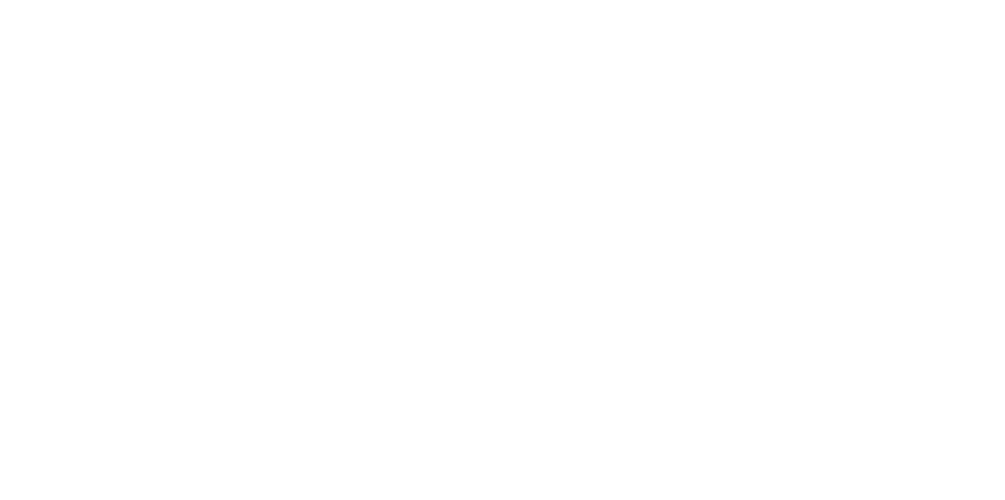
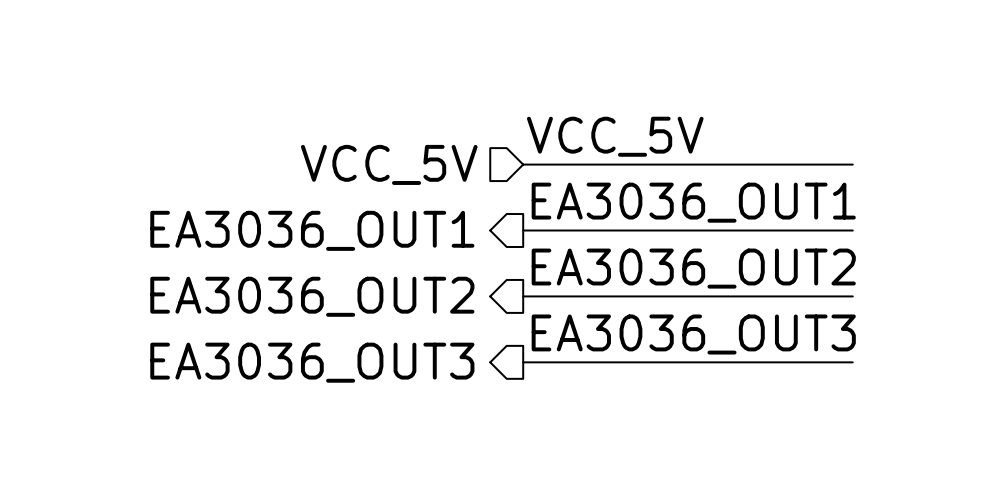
label: none -> VCC_5V (615, 136)
hierarchical label: none -> VCC_5V (389, 164)
wire: none -> (523, 164) (852, 164)
label: none -> EA3036_OUT1 (693, 202)
hierarchical label: none -> EA3036_OUT1 (312, 230)
wire: none -> (523, 230) (852, 230)
label: none -> EA3036_OUT2 (693, 268)
hierarchical label: none -> EA3036_OUT2 (312, 296)
wire: none -> (523, 296) (852, 296)
label: none -> EA3036_OUT3 (693, 334)
hierarchical label: none -> EA3036_OUT3 (312, 362)
wire: none -> (523, 362) (852, 362)

